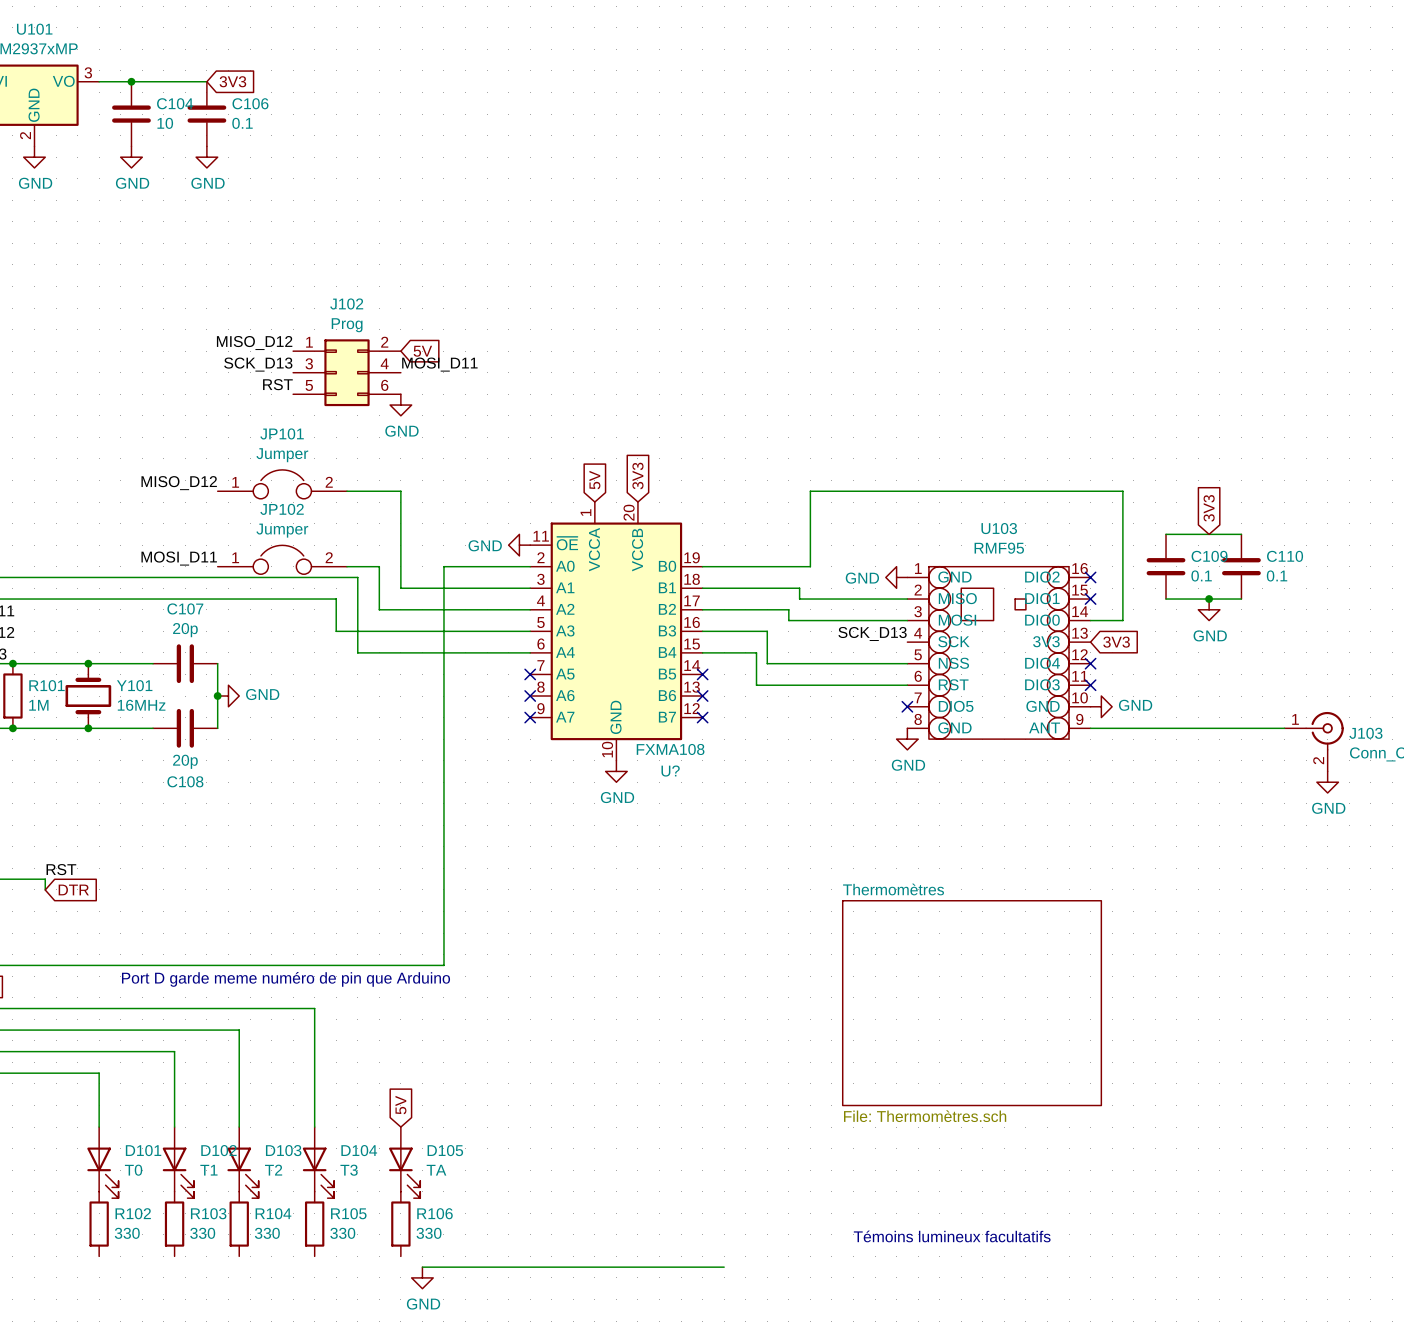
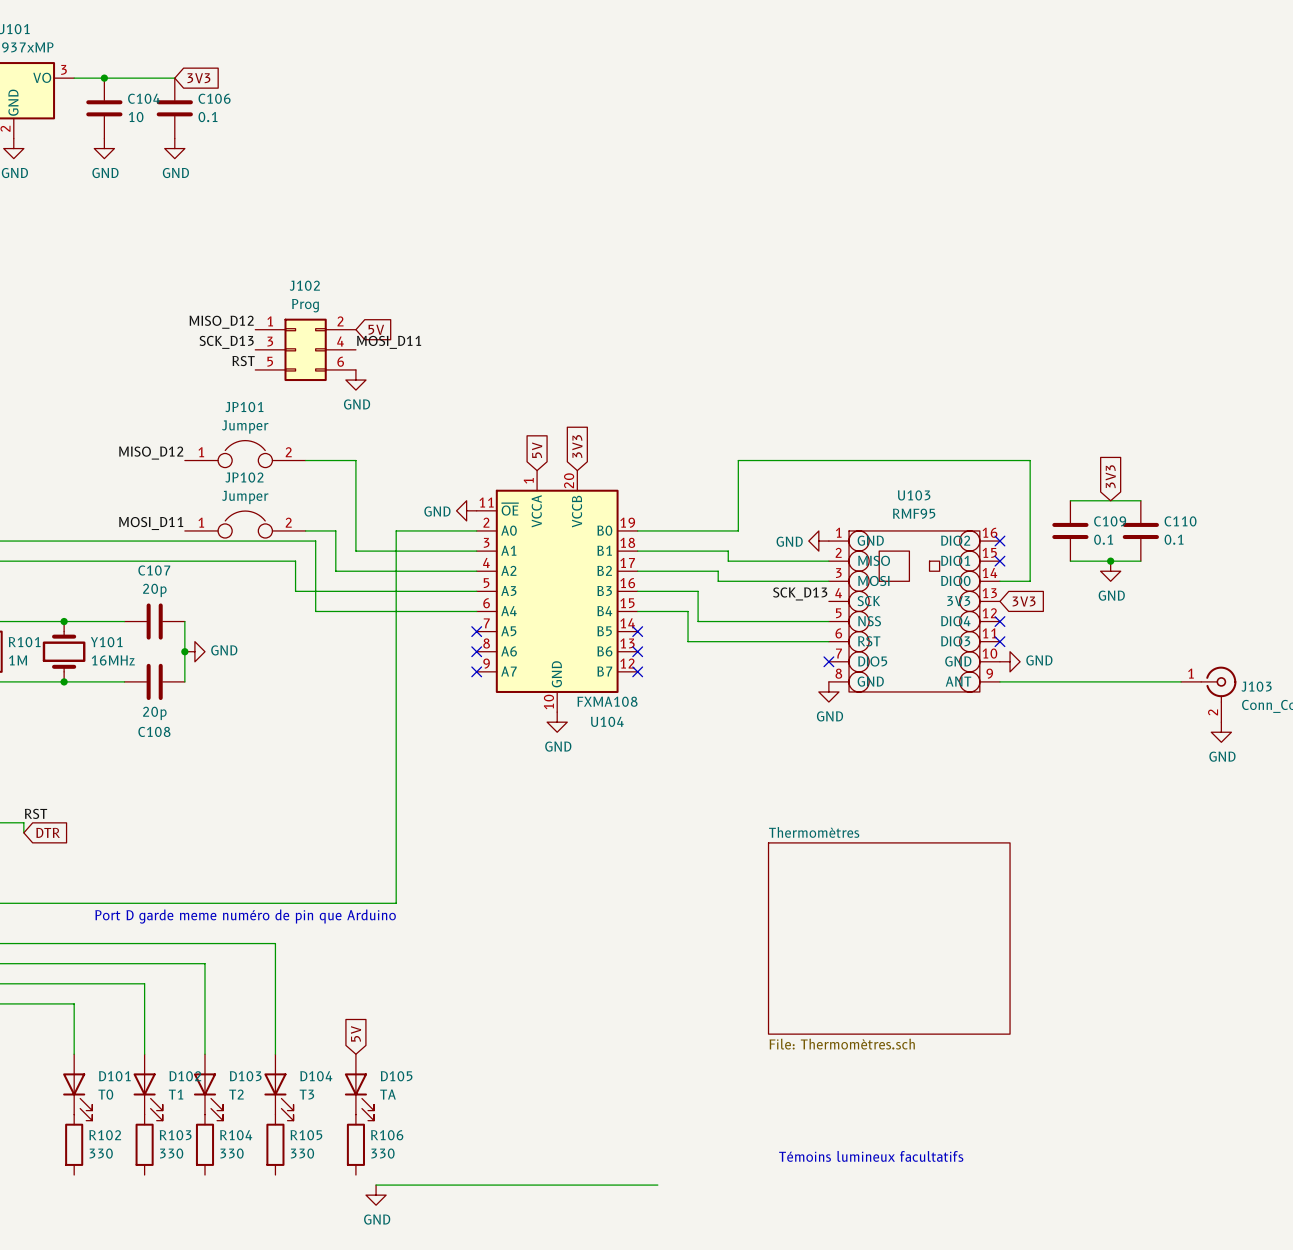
U? name: U? (670, 771) -> U104 (607, 721)

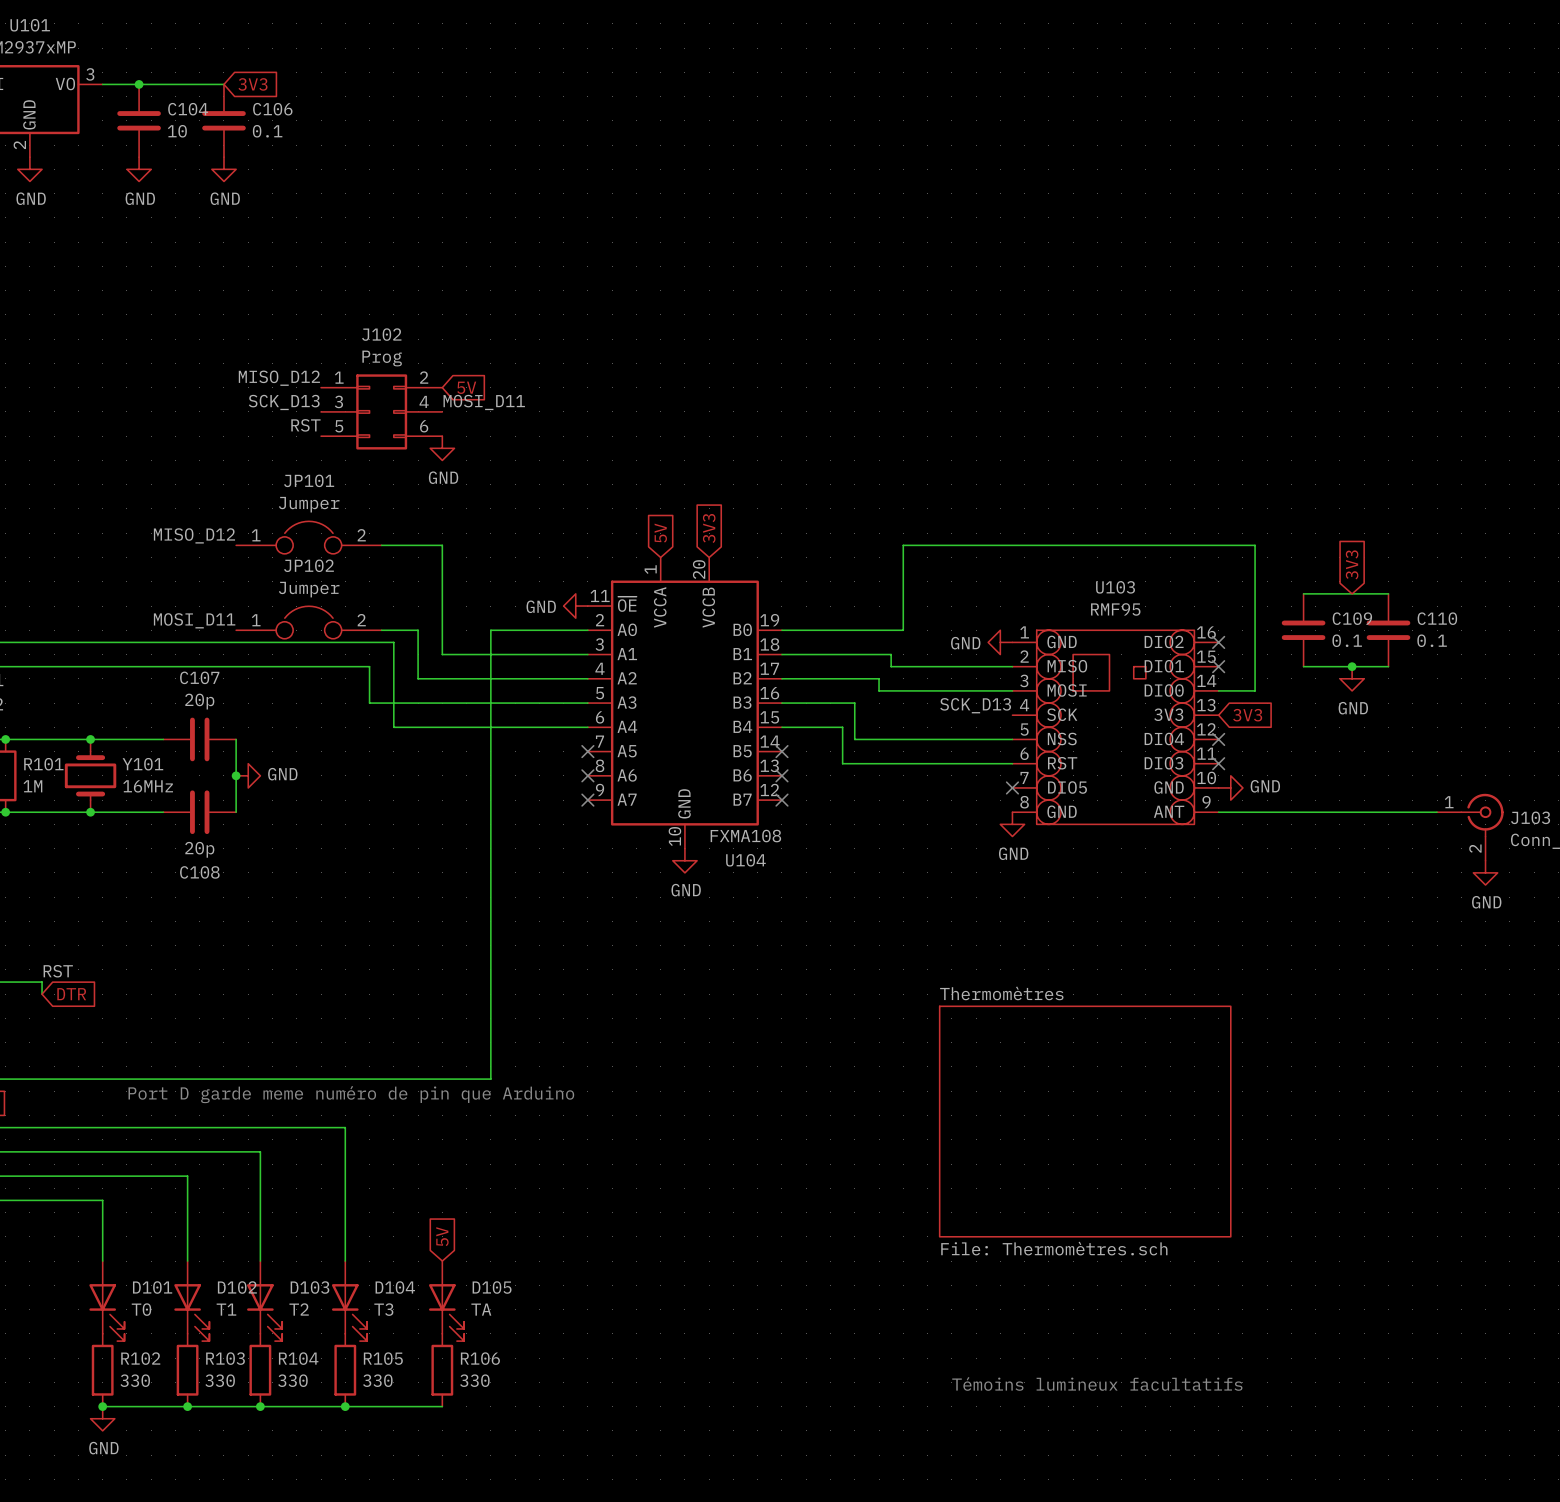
wire: none -> (102, 1406) (442, 1406)
junction: none -> (102, 1406)
junction: none -> (187, 1406)
junction: none -> (260, 1406)
junction: none -> (345, 1406)
power symbol: none -> GND (102, 1418)
wire: (376, 1185) (657, 1185) -> none
power symbol: GND (376, 1195) -> none

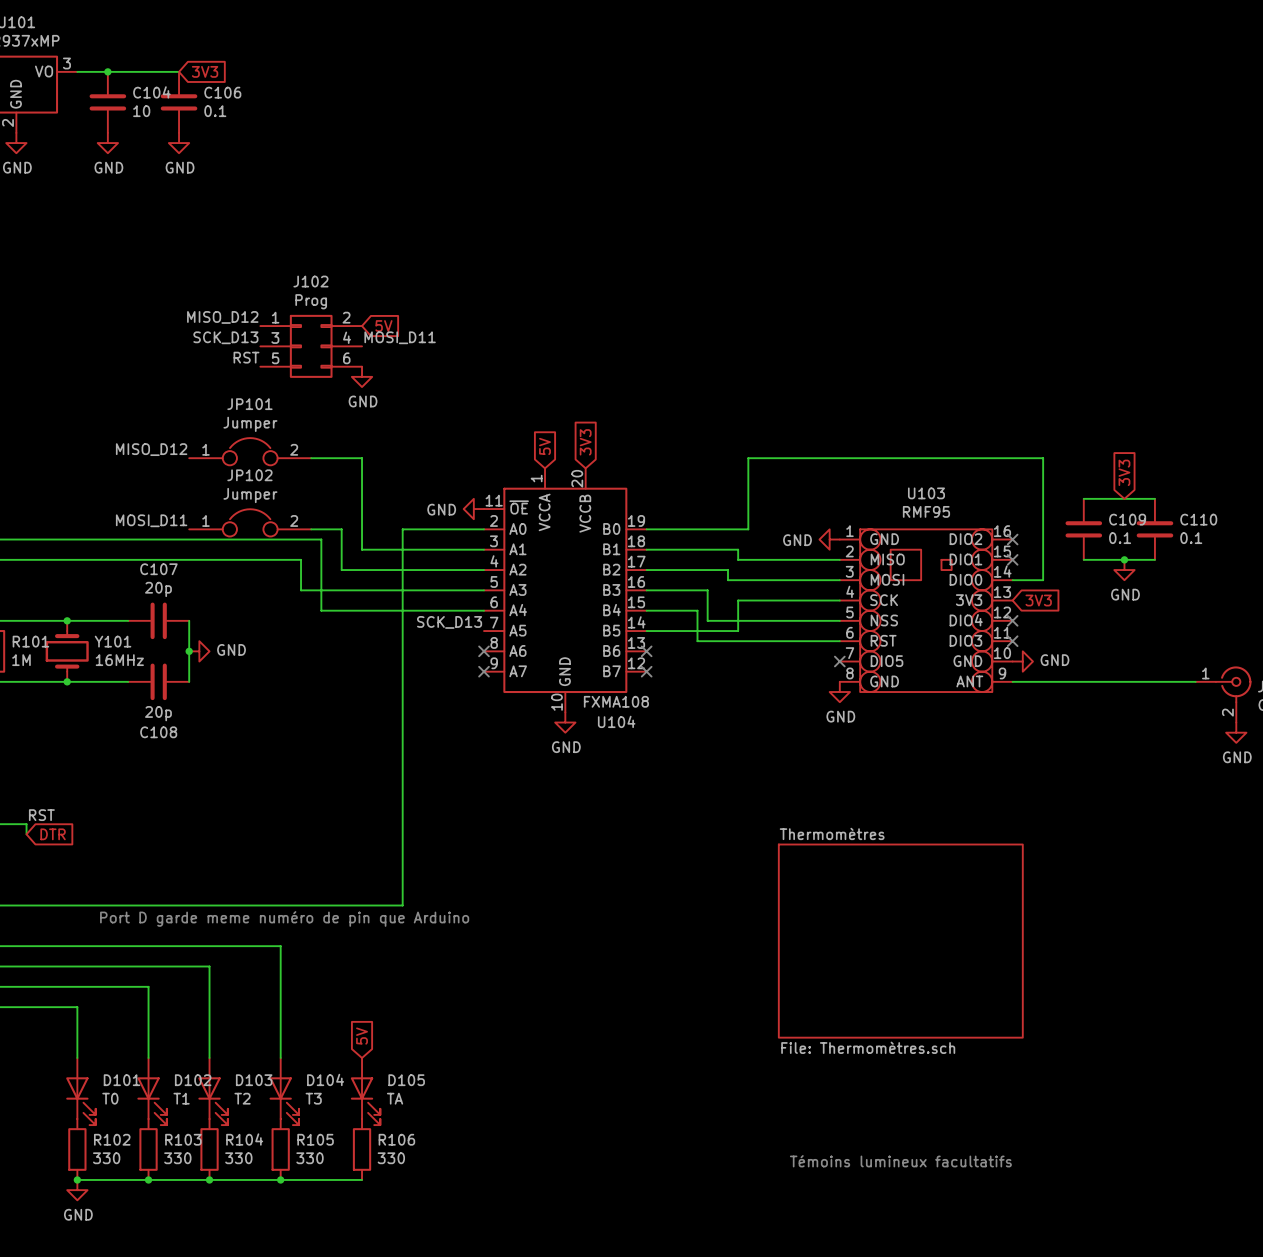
label: SCK_D13 (975, 705) -> none
wire: none -> (839, 600) (738, 600) (738, 631) (646, 631)
label: none -> SCK_D13 (449, 622)
no-connect mark: (587, 751) -> none
no-connect mark: (781, 751) -> none

